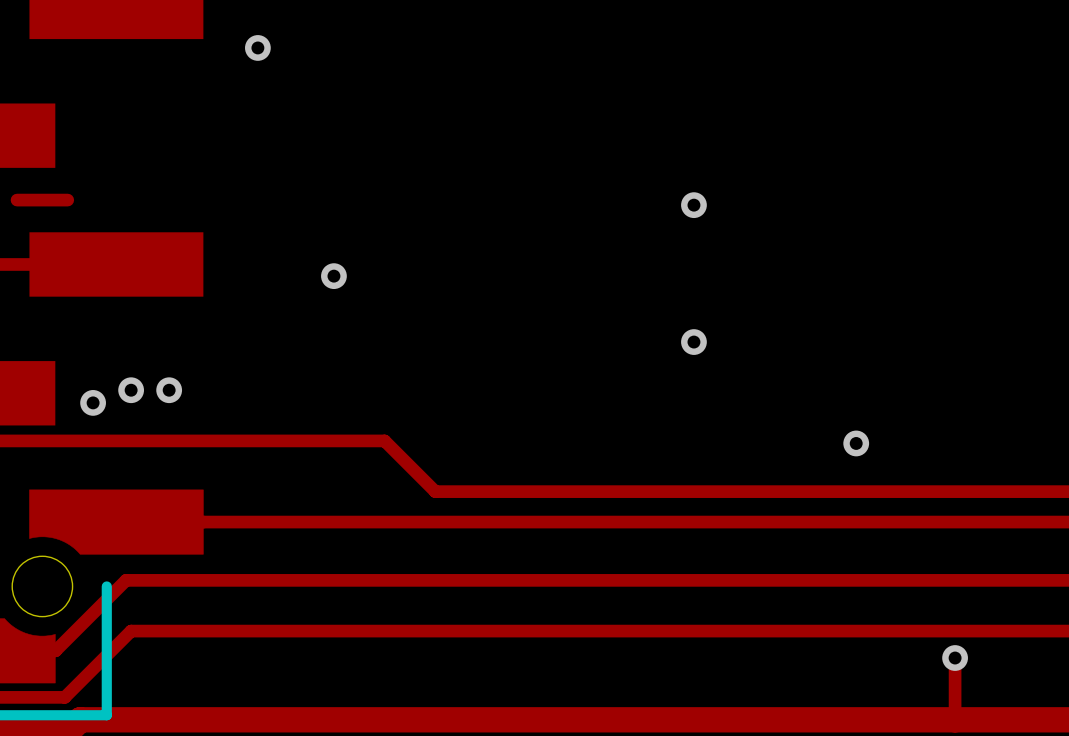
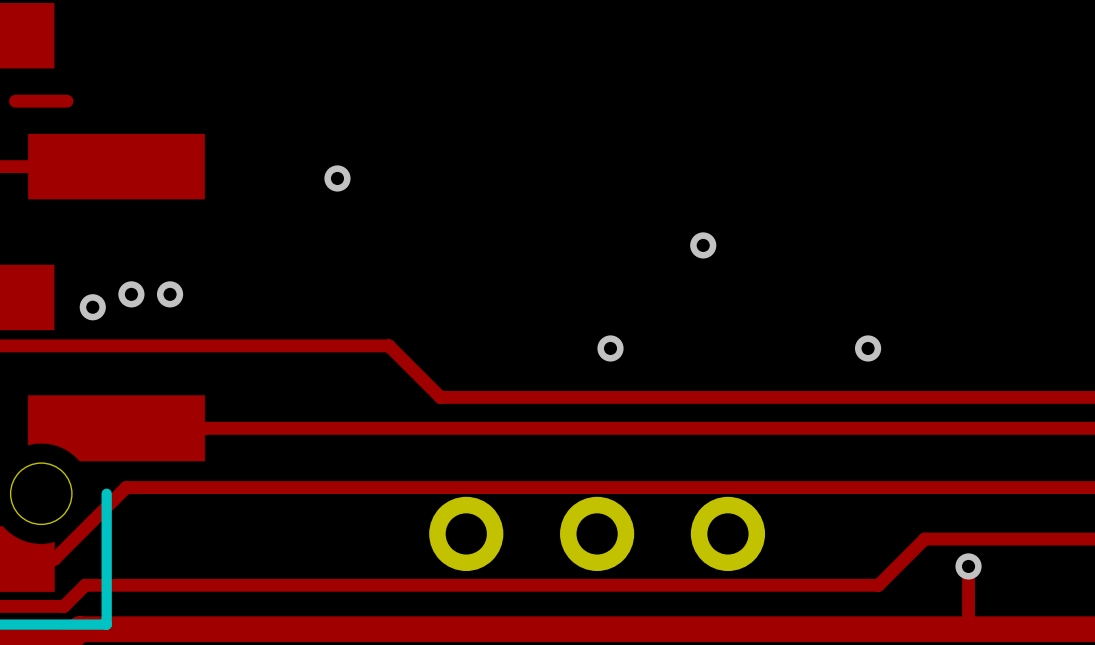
via position: (693, 205) -> (610, 348)
part: none -> (597, 533)
track: (911, 631) (131, 631) (85, 676) -> (924, 539) (878, 585) (85, 585)

